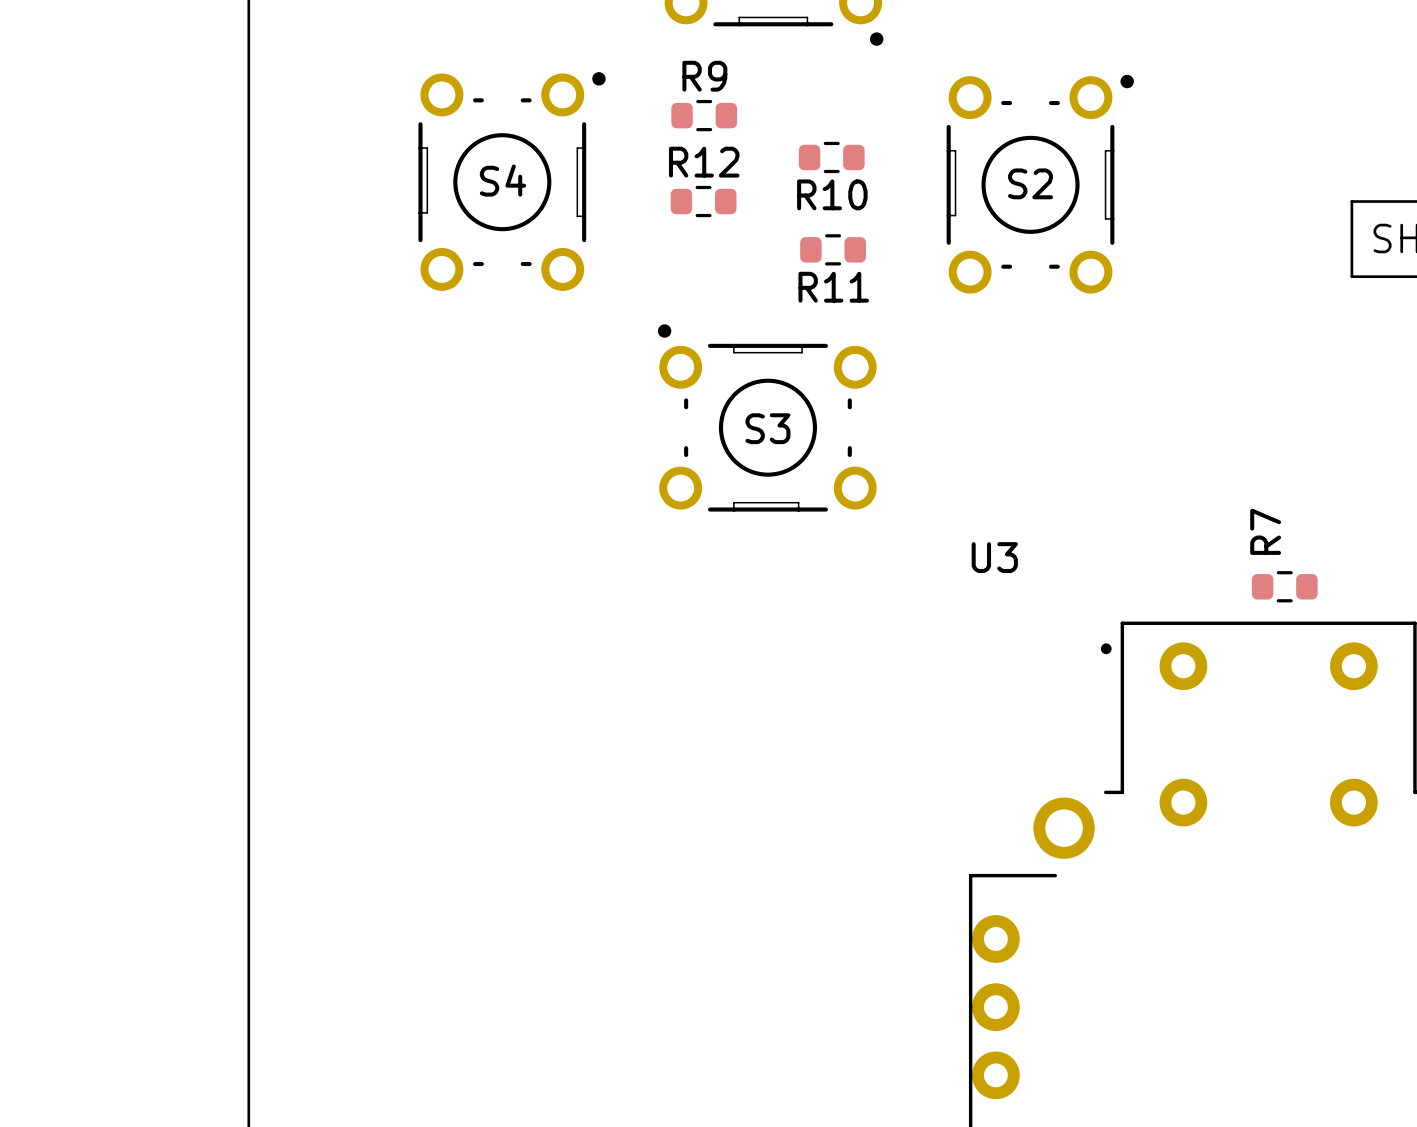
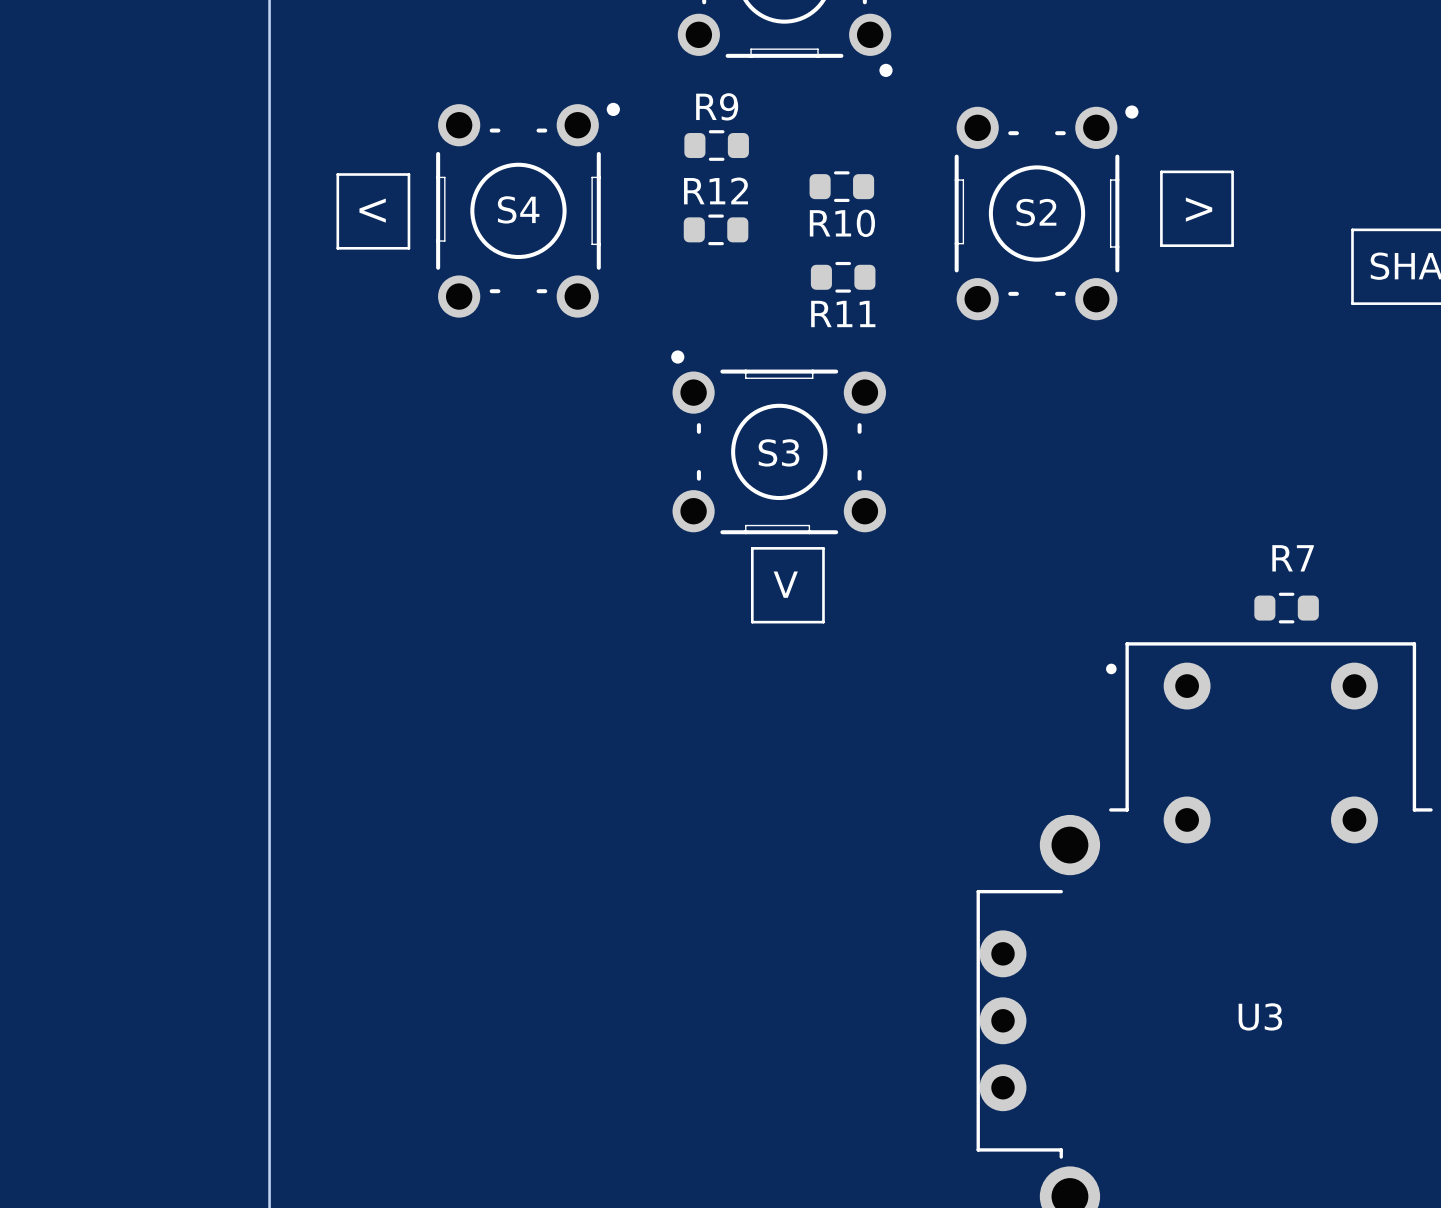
line: none -> (1161, 171) (1232, 171) (1232, 245) (1161, 245) (1161, 171)
line: none -> (337, 174) (408, 174) (408, 248) (337, 248) (337, 174)
text: none -> V (1199, 209)
text: none -> V (372, 210)
line: none -> (752, 548) (823, 548) (823, 622) (752, 622) (752, 548)
R7 name rotation: 0° (1265, 531) -> 90° clockwise (1293, 558)
U3 name position: U3 (994, 557) -> U3 (1260, 1016)
text: none -> V (785, 584)

